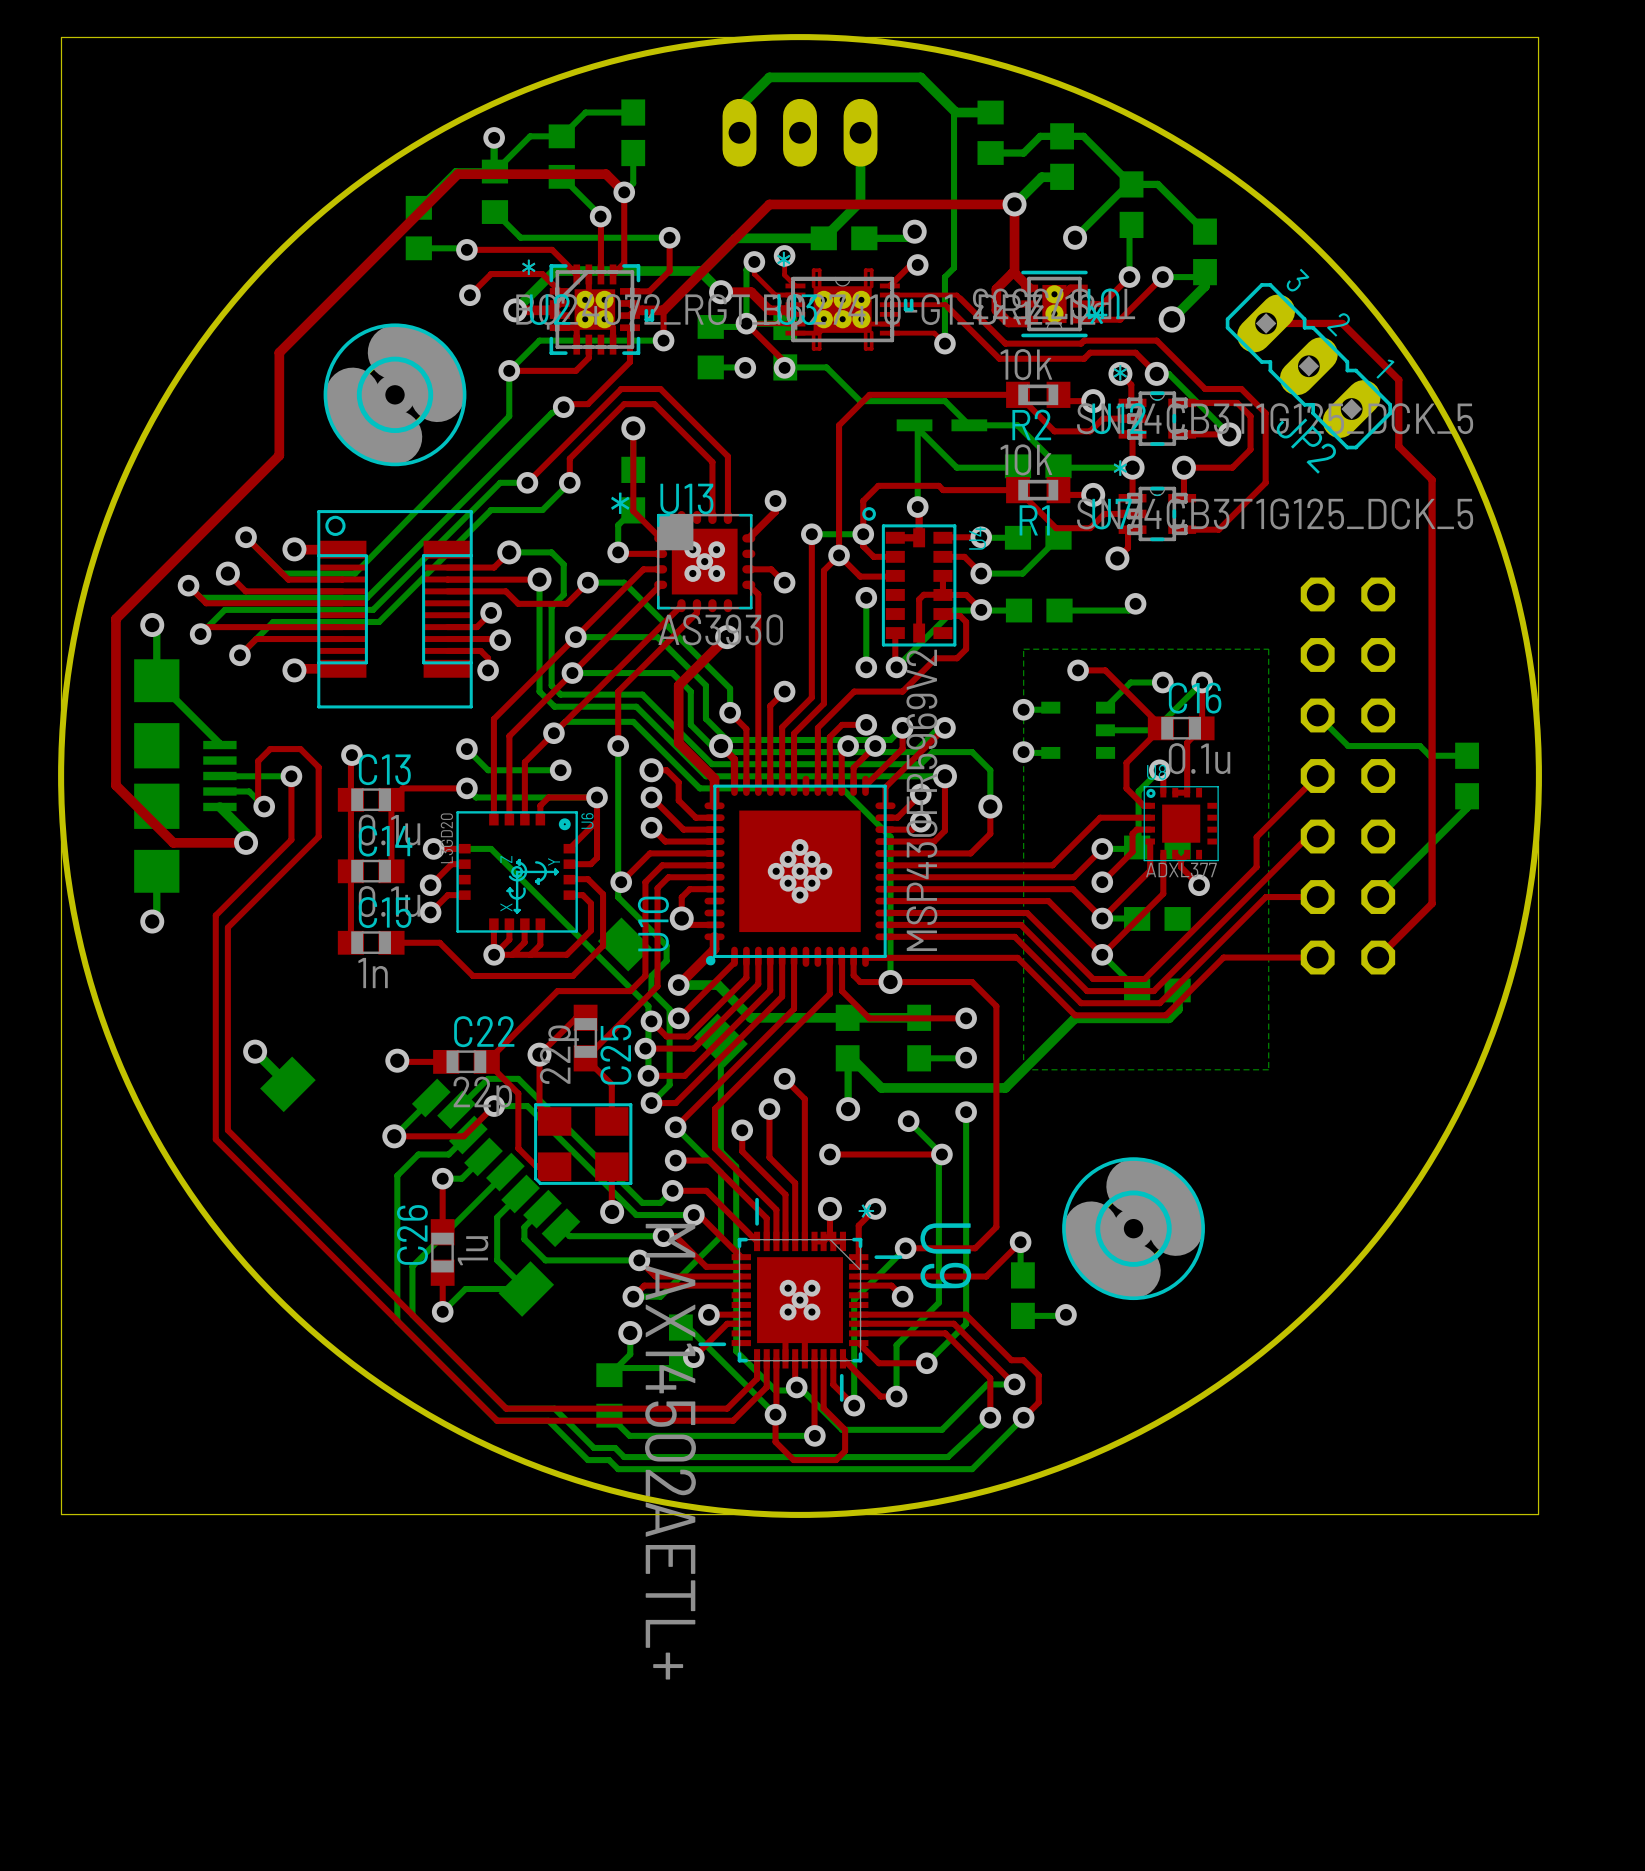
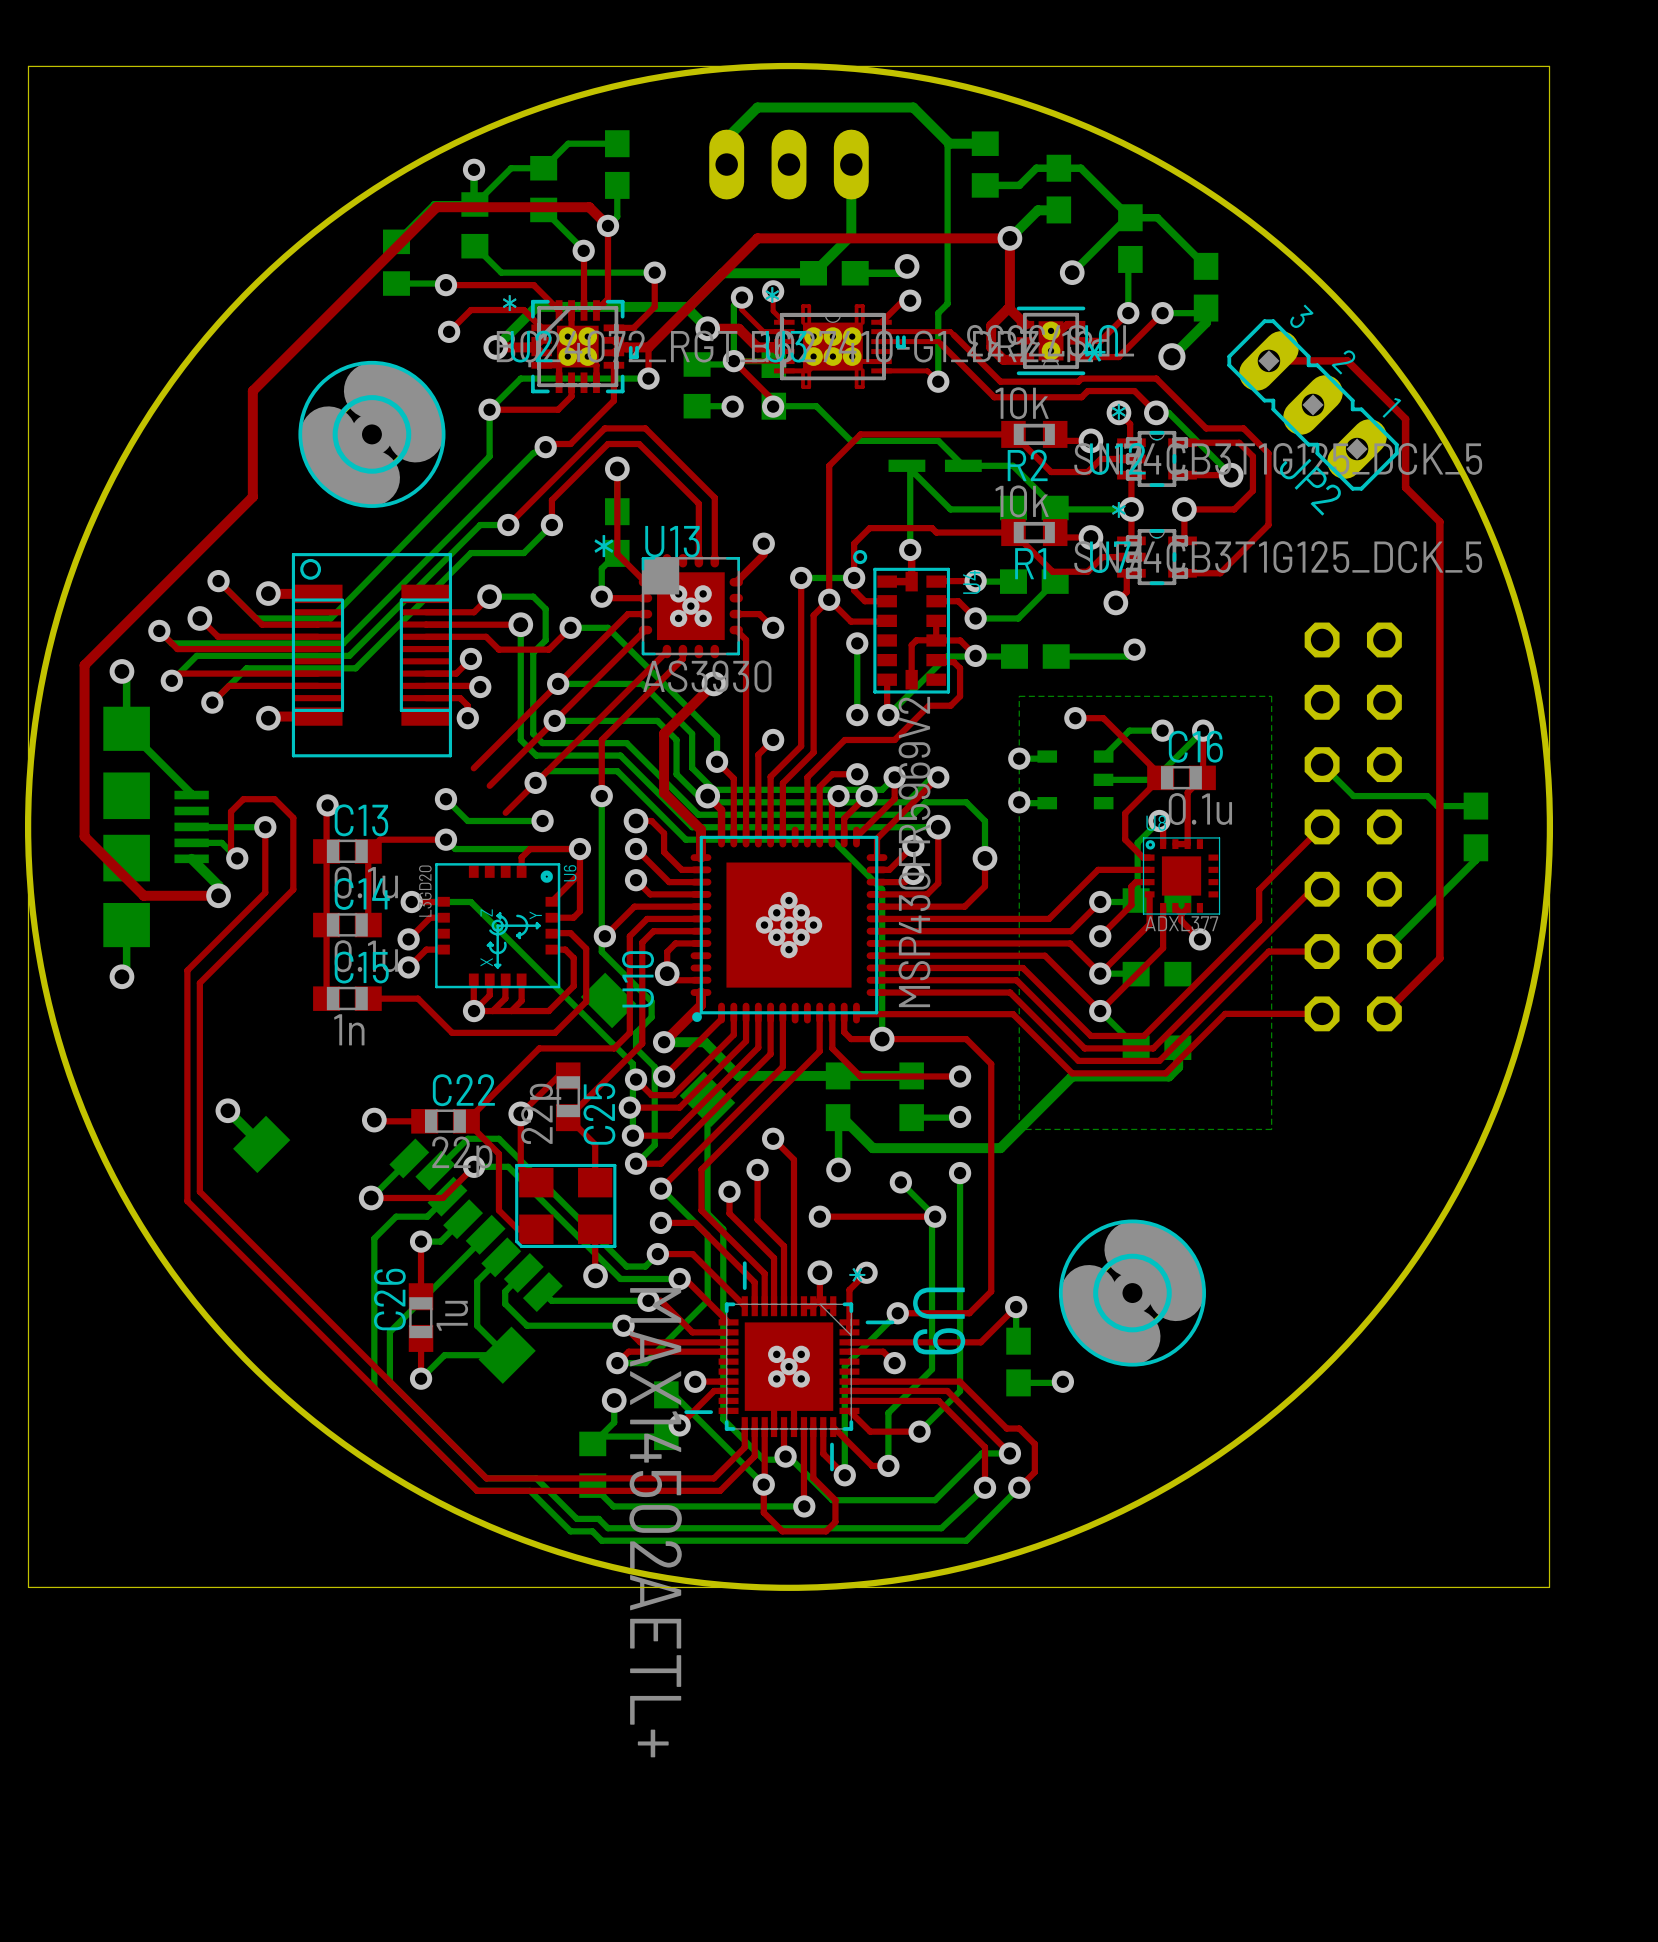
top track: (493, 719) (493, 819) -> none
top track: (509, 736) (509, 819) -> none
top track: (524, 762) (524, 819) -> none

